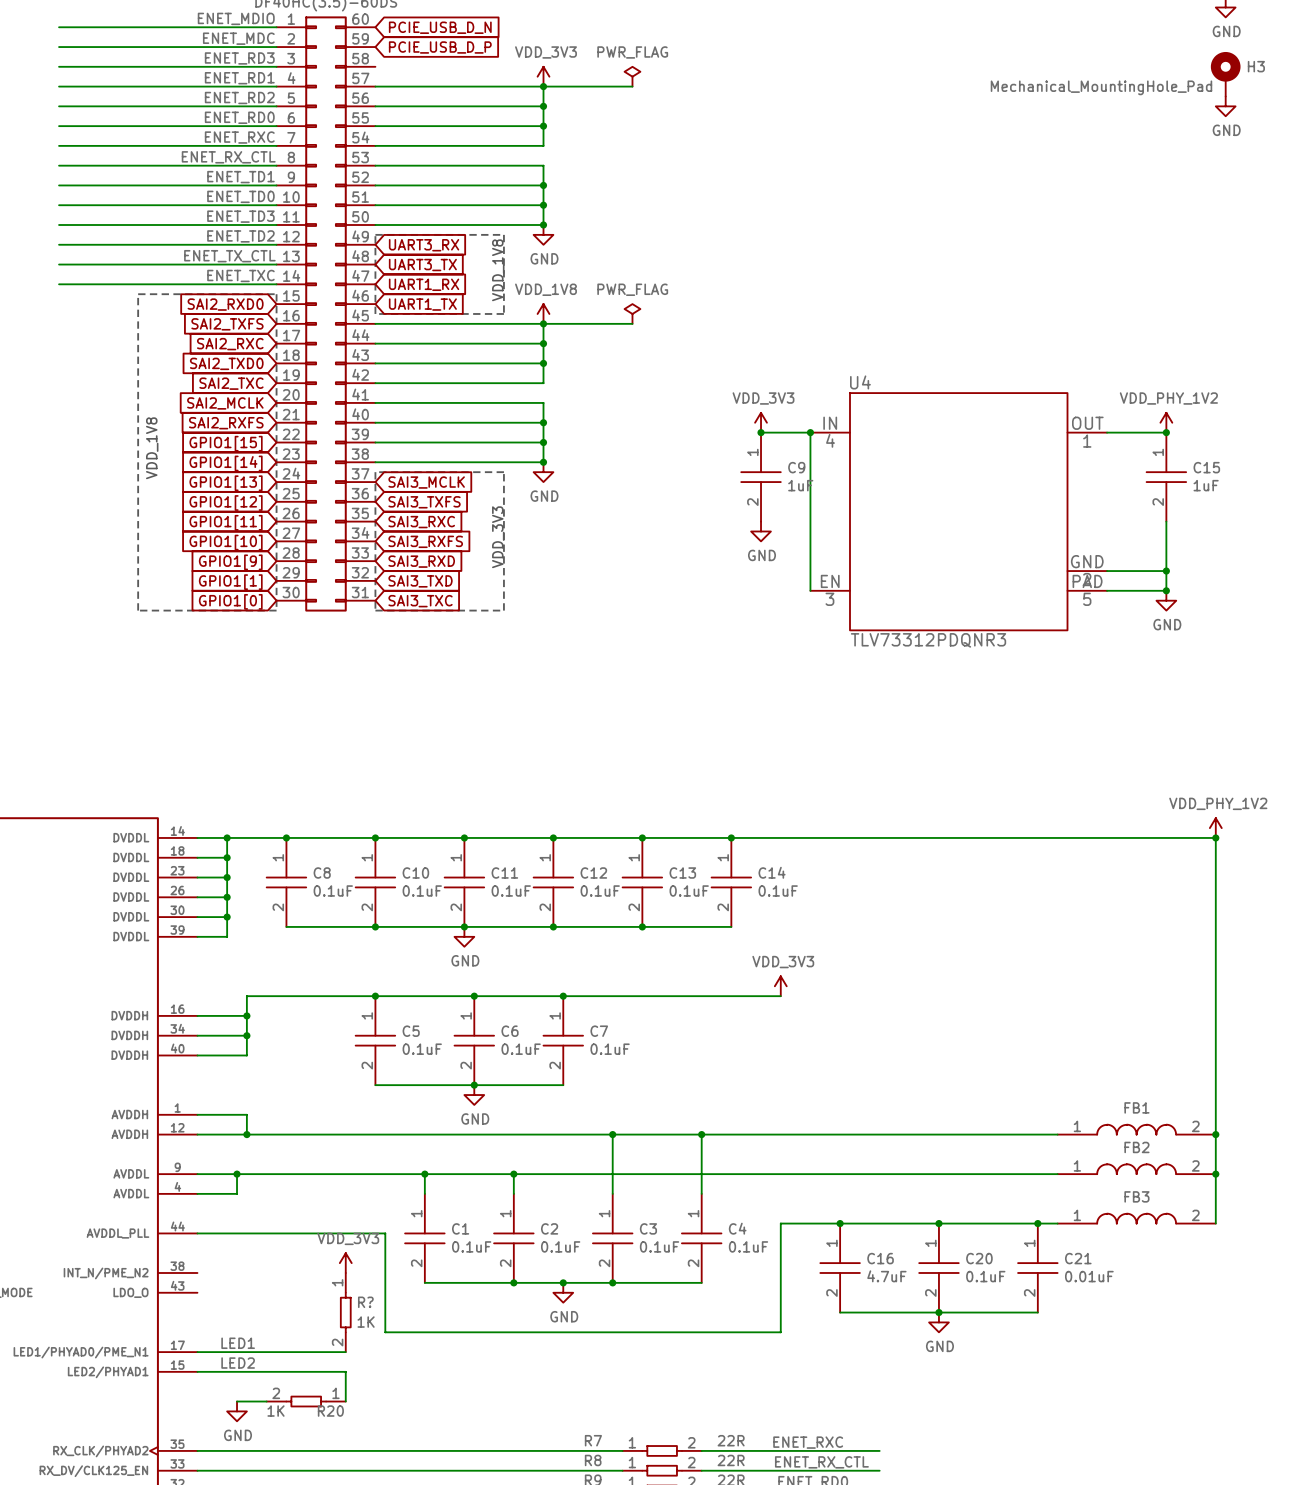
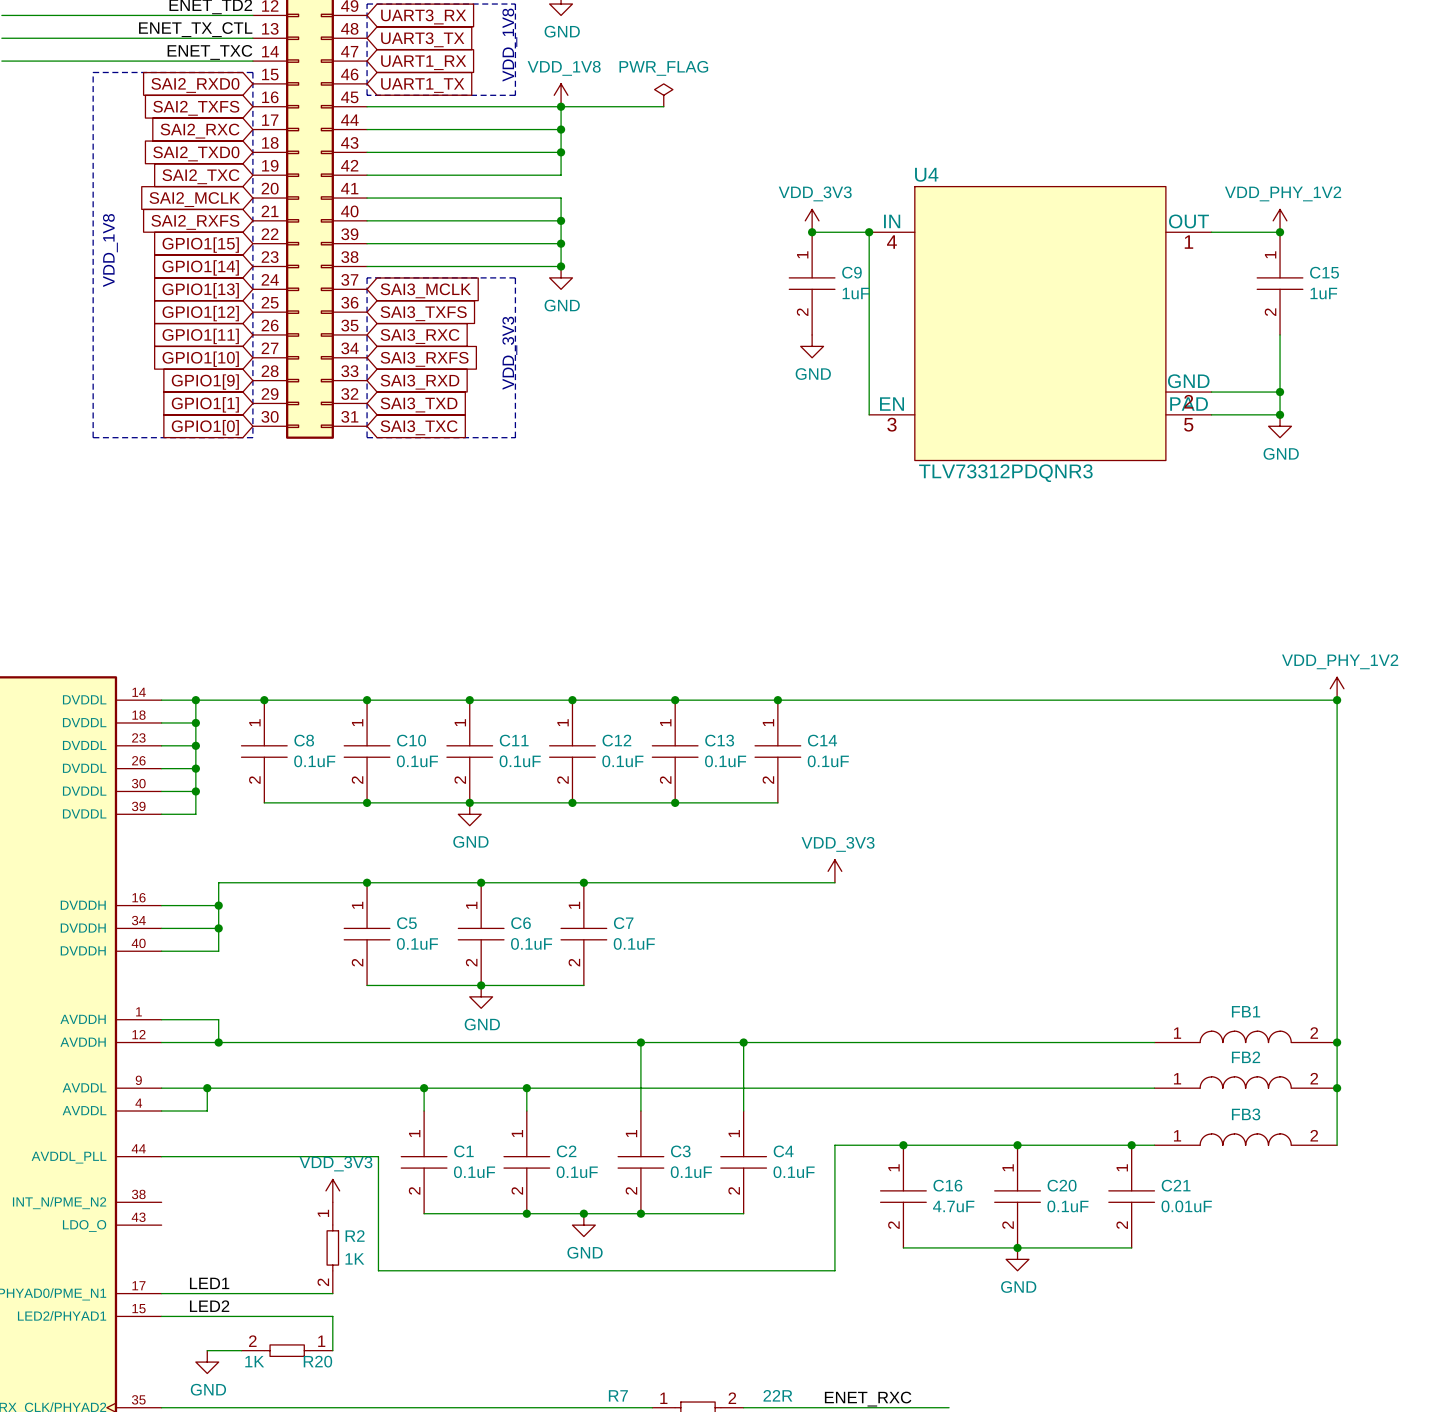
R? name: R? (365, 1302) -> R2 (355, 1236)

